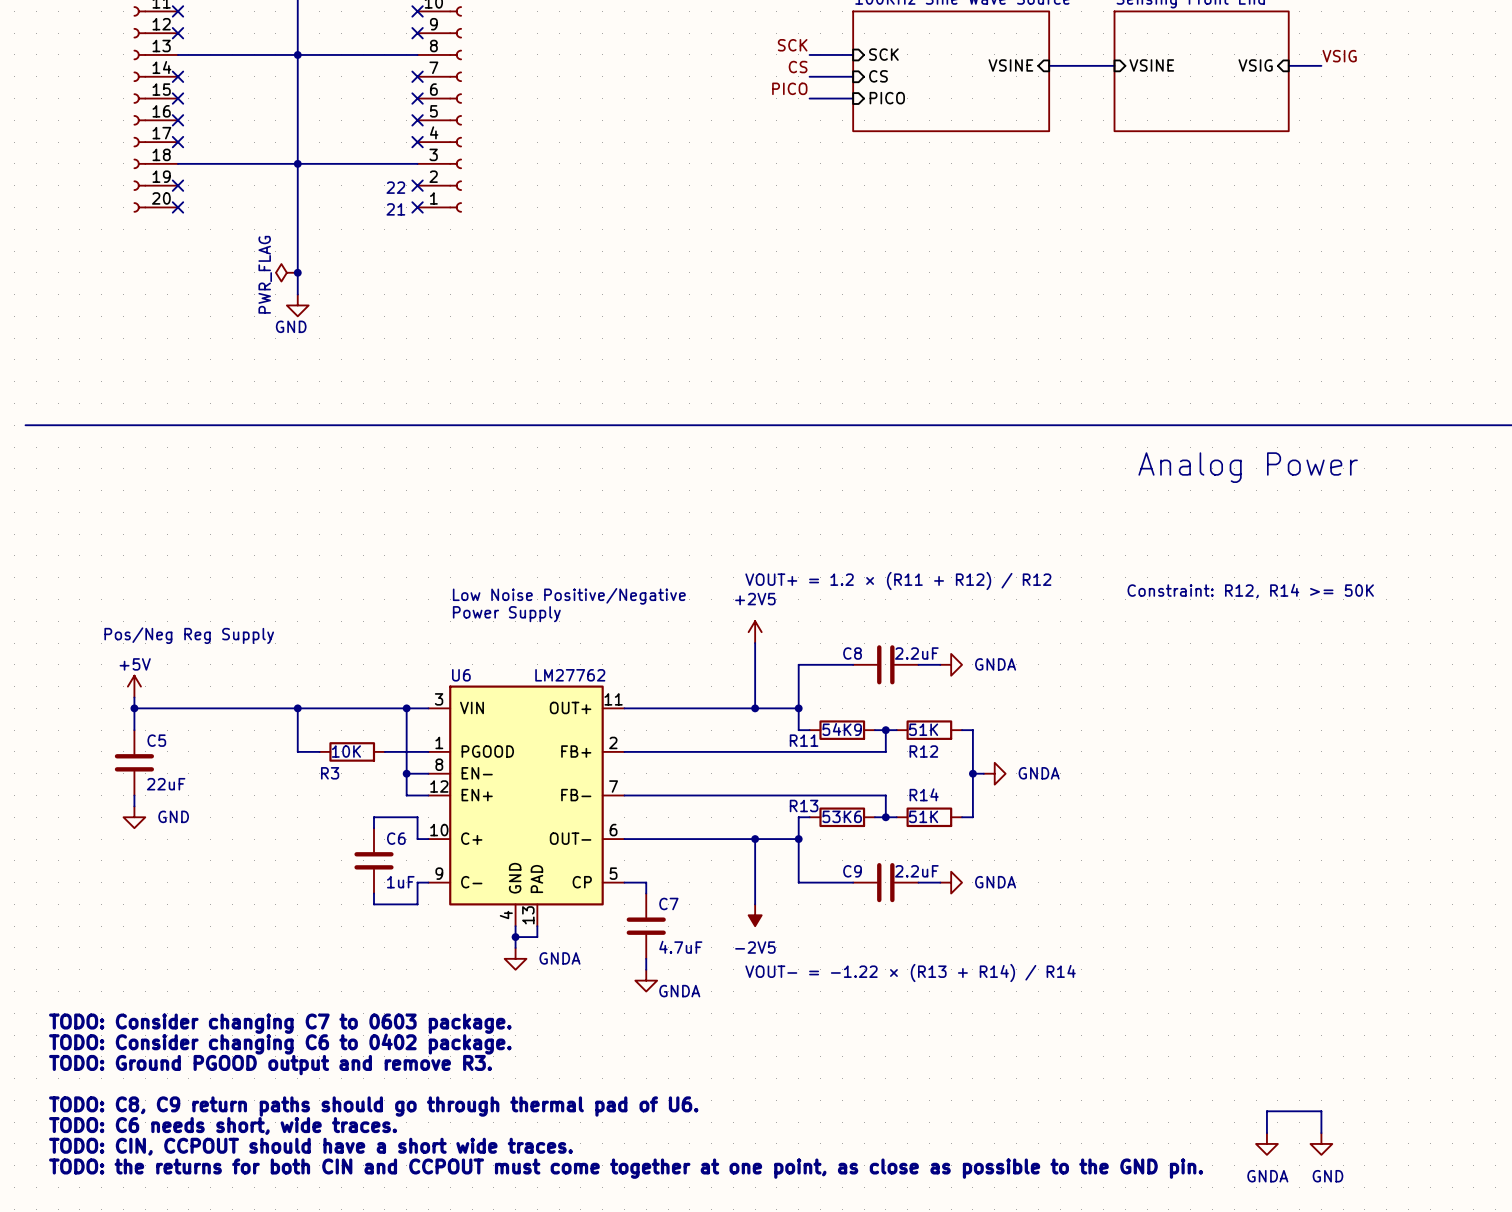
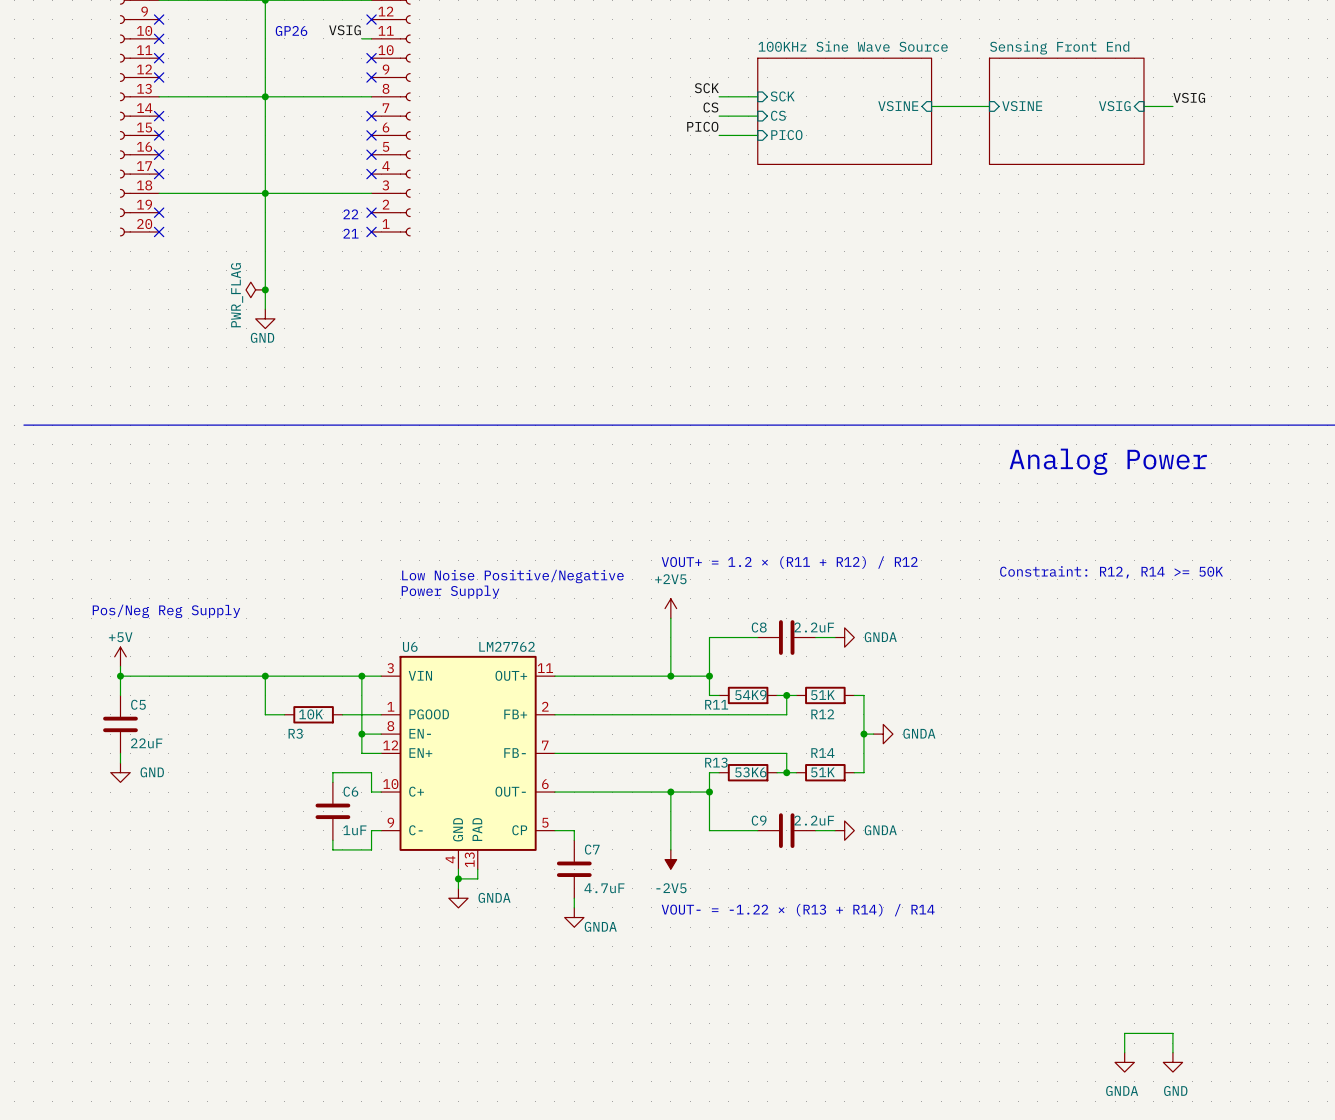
text: TODO: Consider changing C7 to 0603 package. (280, 1023) -> none
text: TODO: Consider changing C6 to 0402 package. (280, 1044) -> none
text: TODO: Ground PGOOD output and remove R3. (270, 1065) -> none
text: TODO: C8, C9 return paths should go through thermal pad of U6. (373, 1106) -> none
text: TODO: C6 needs short, wide traces. (223, 1125) -> none
text: TODO: CIN, CCPOUT should have a short wide traces. (310, 1146) -> none
text: TODO: the returns for both CIN and CCPOUT must come together at one point, as close as possible to the GND pin. (626, 1168) -> none

